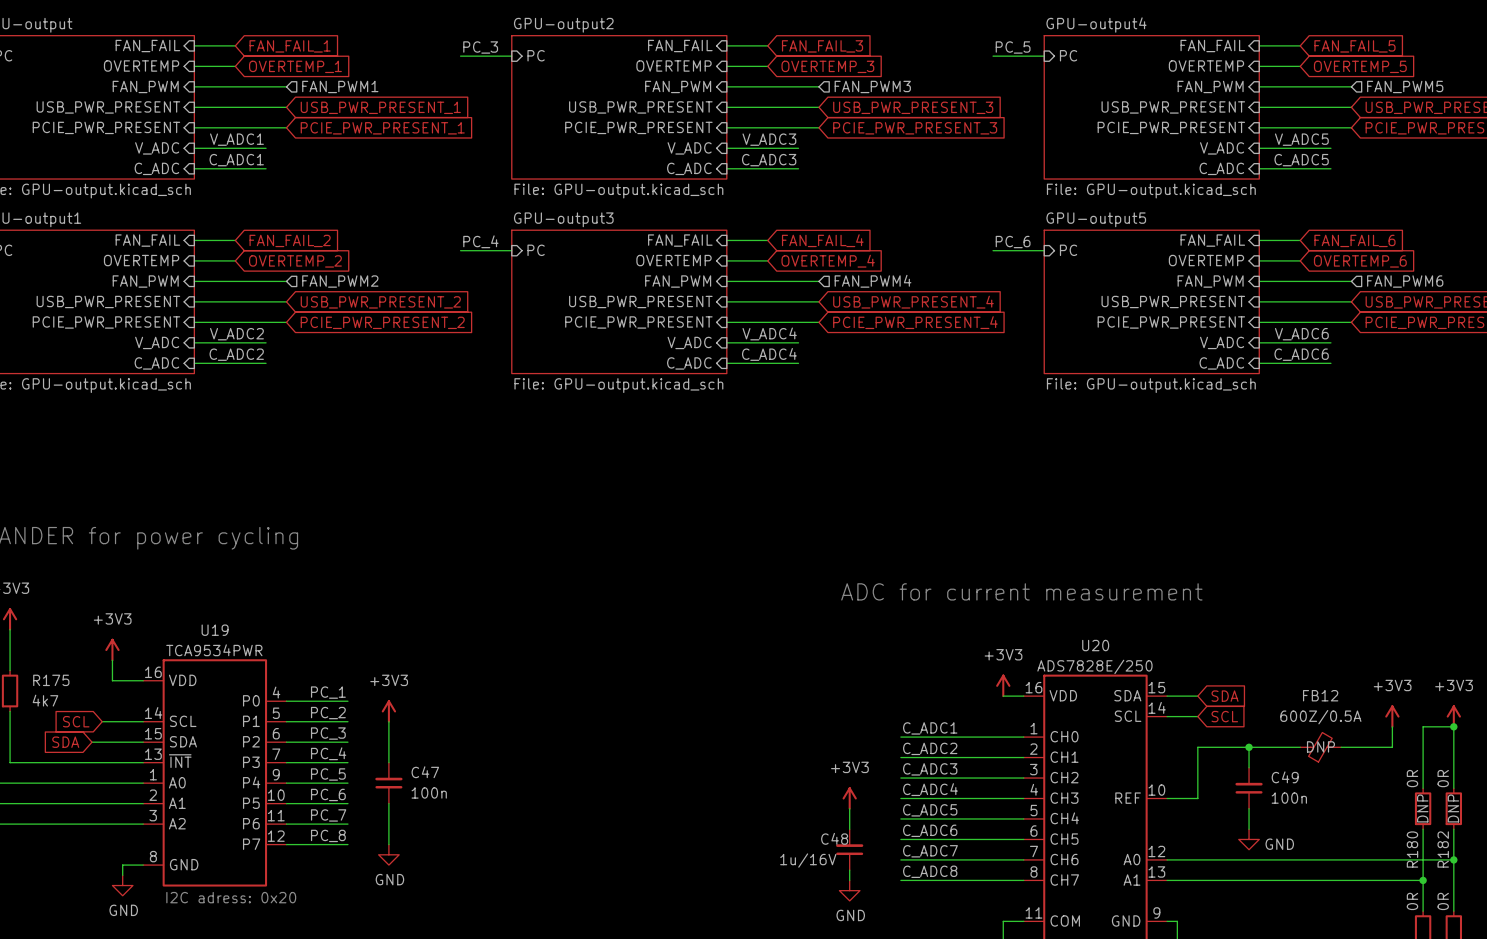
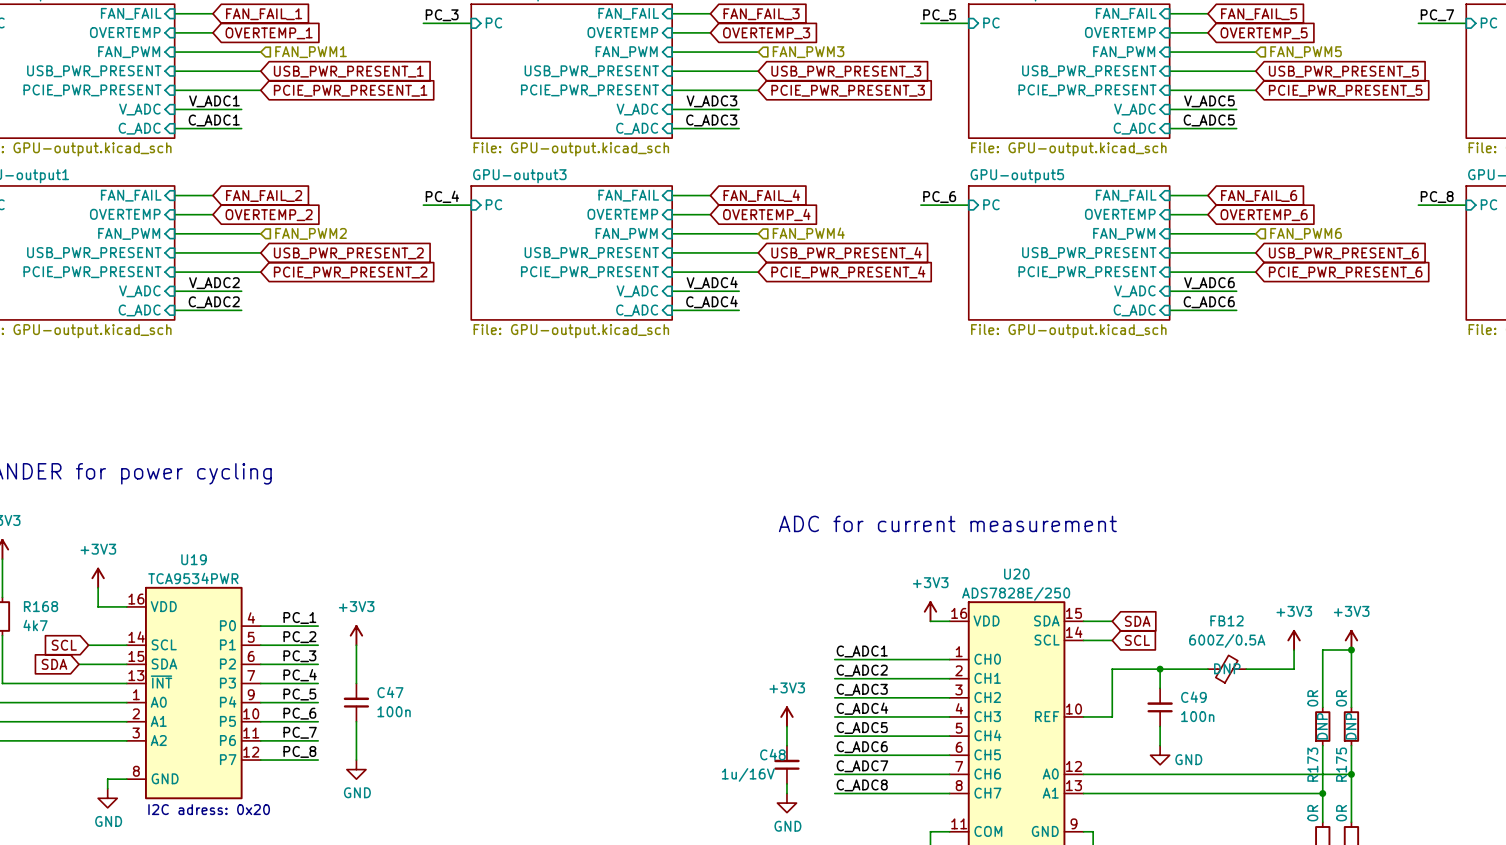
R175 name: R175 (51, 680) -> R168 (41, 606)
R180 name: R180 (1412, 849) -> R173 (1312, 764)
R182 name: R182 (1443, 849) -> R175 (1341, 764)

